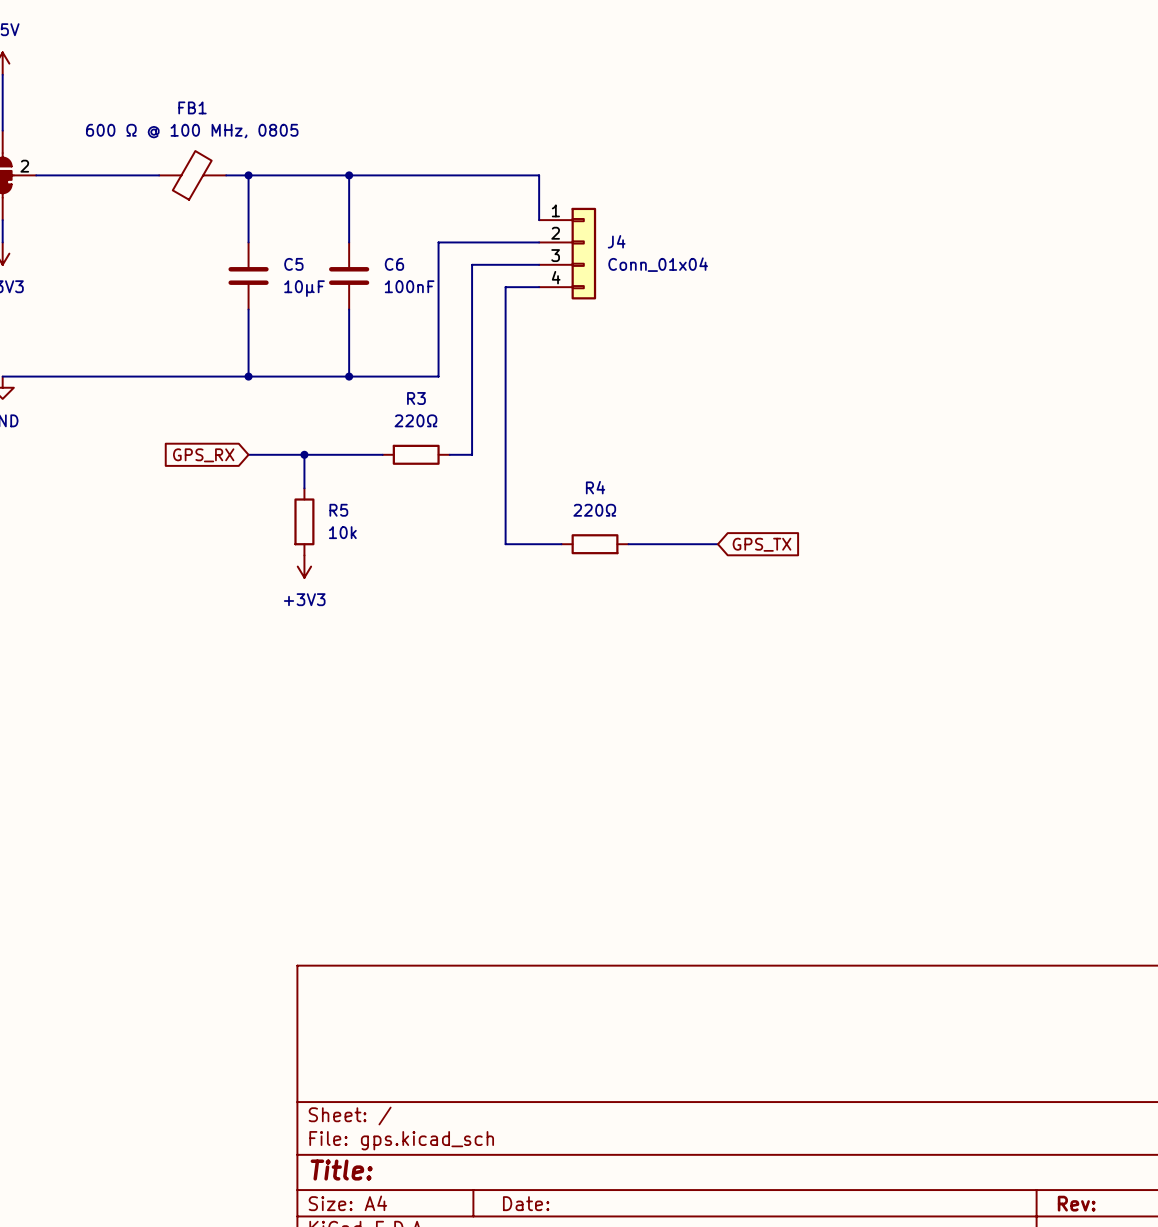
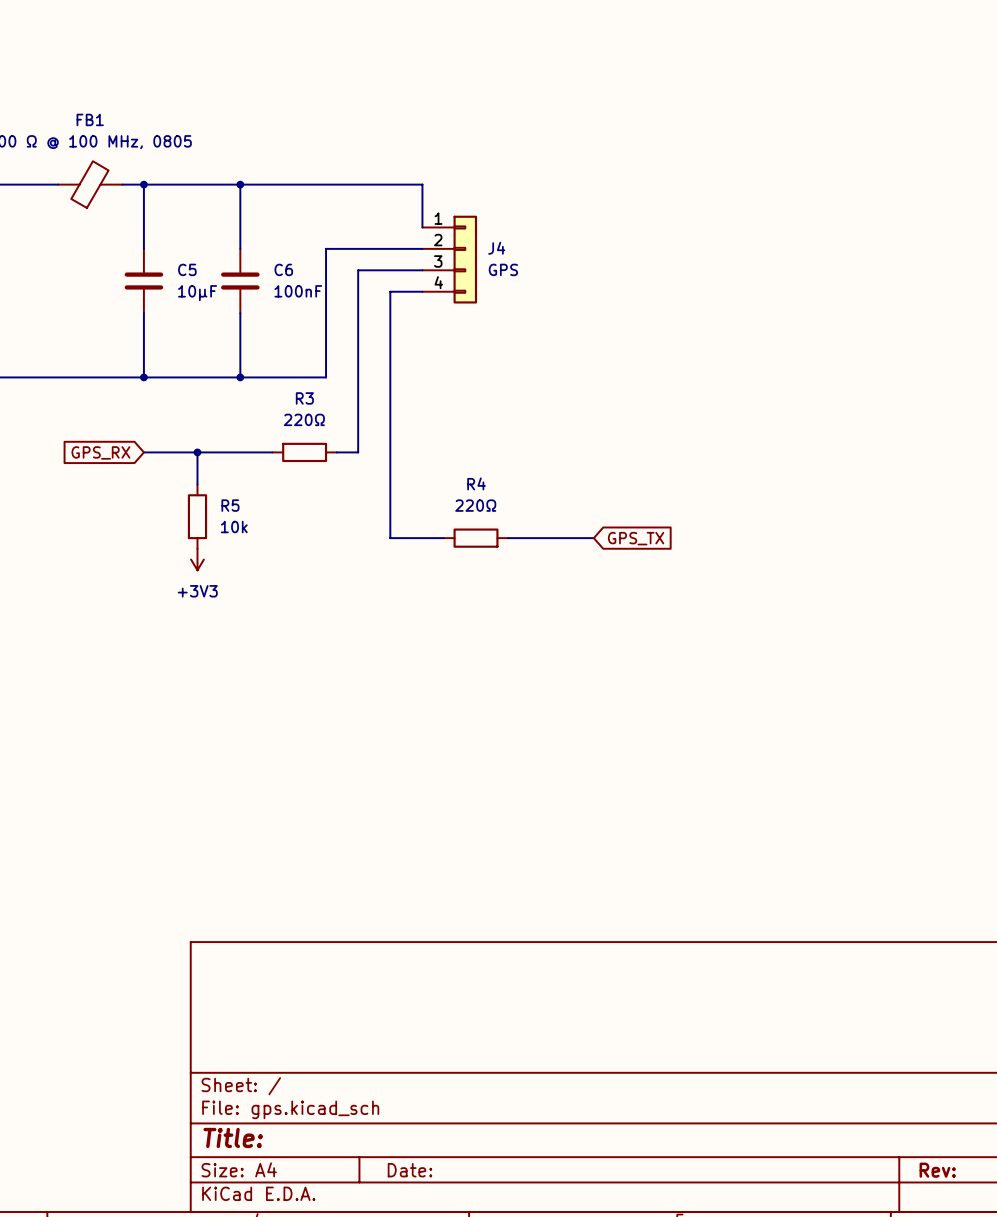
J4 value: Conn_01x04 (658, 264) -> GPS (503, 269)

